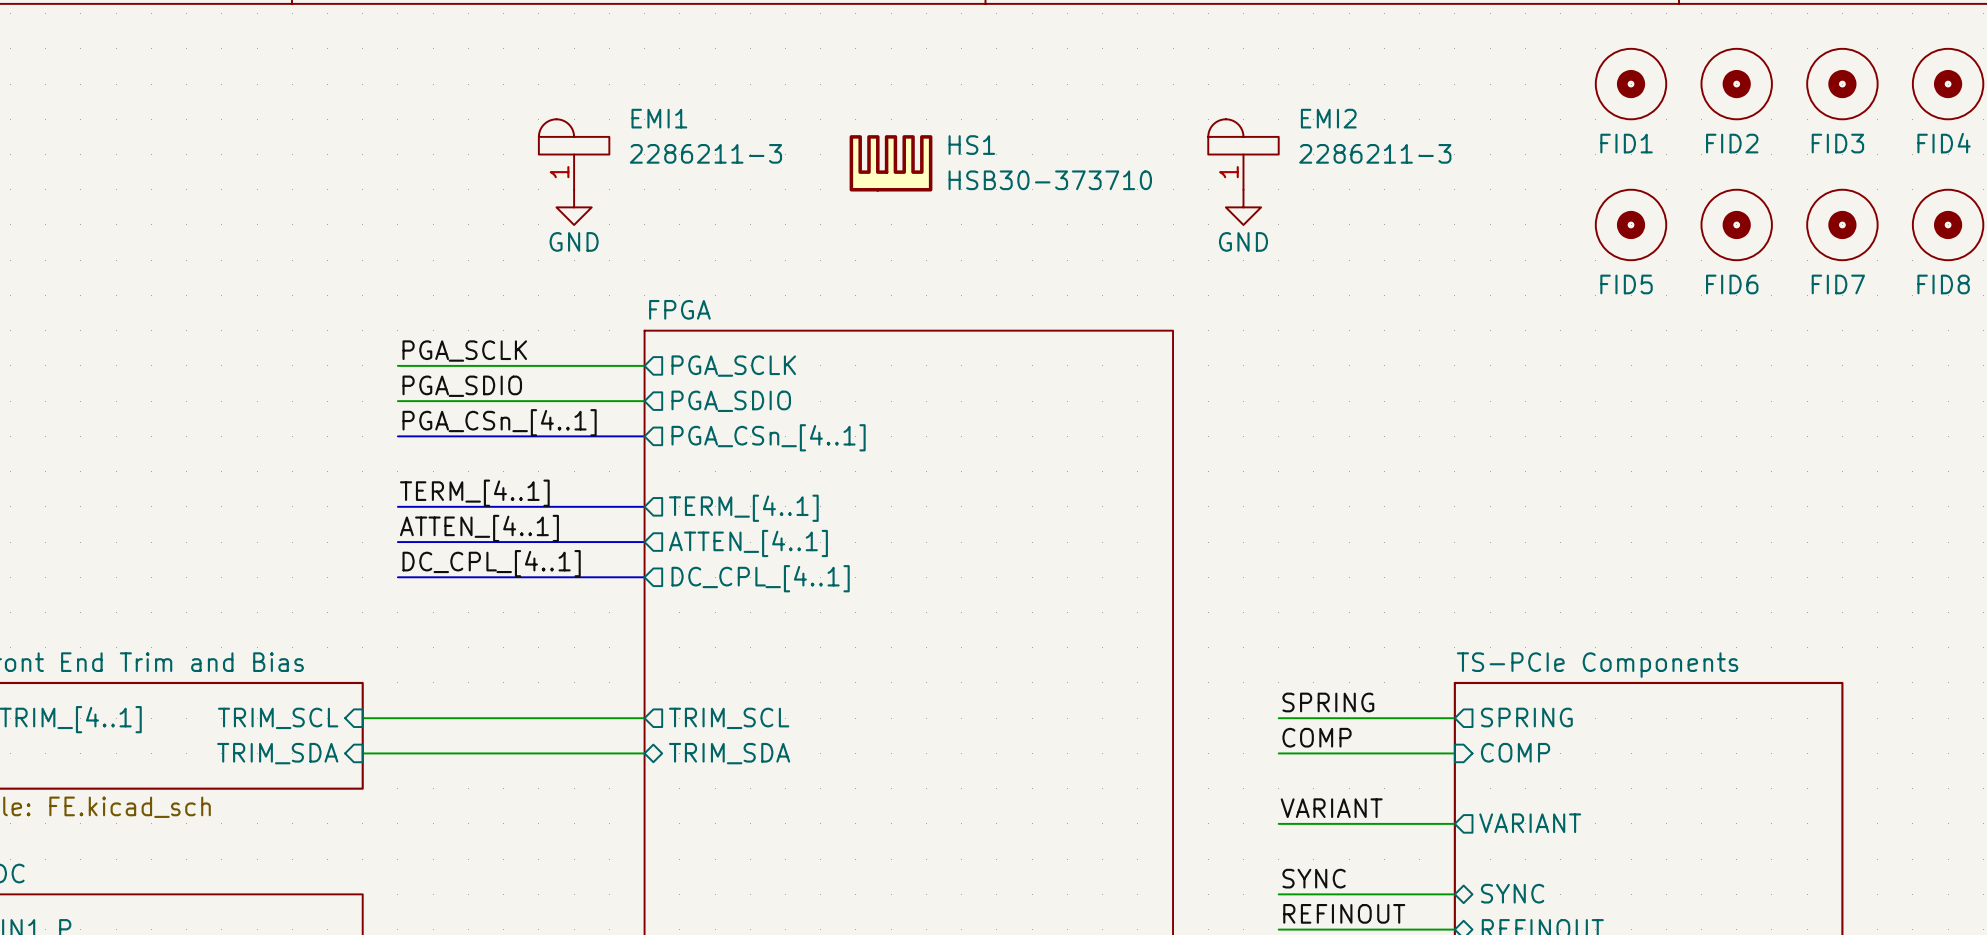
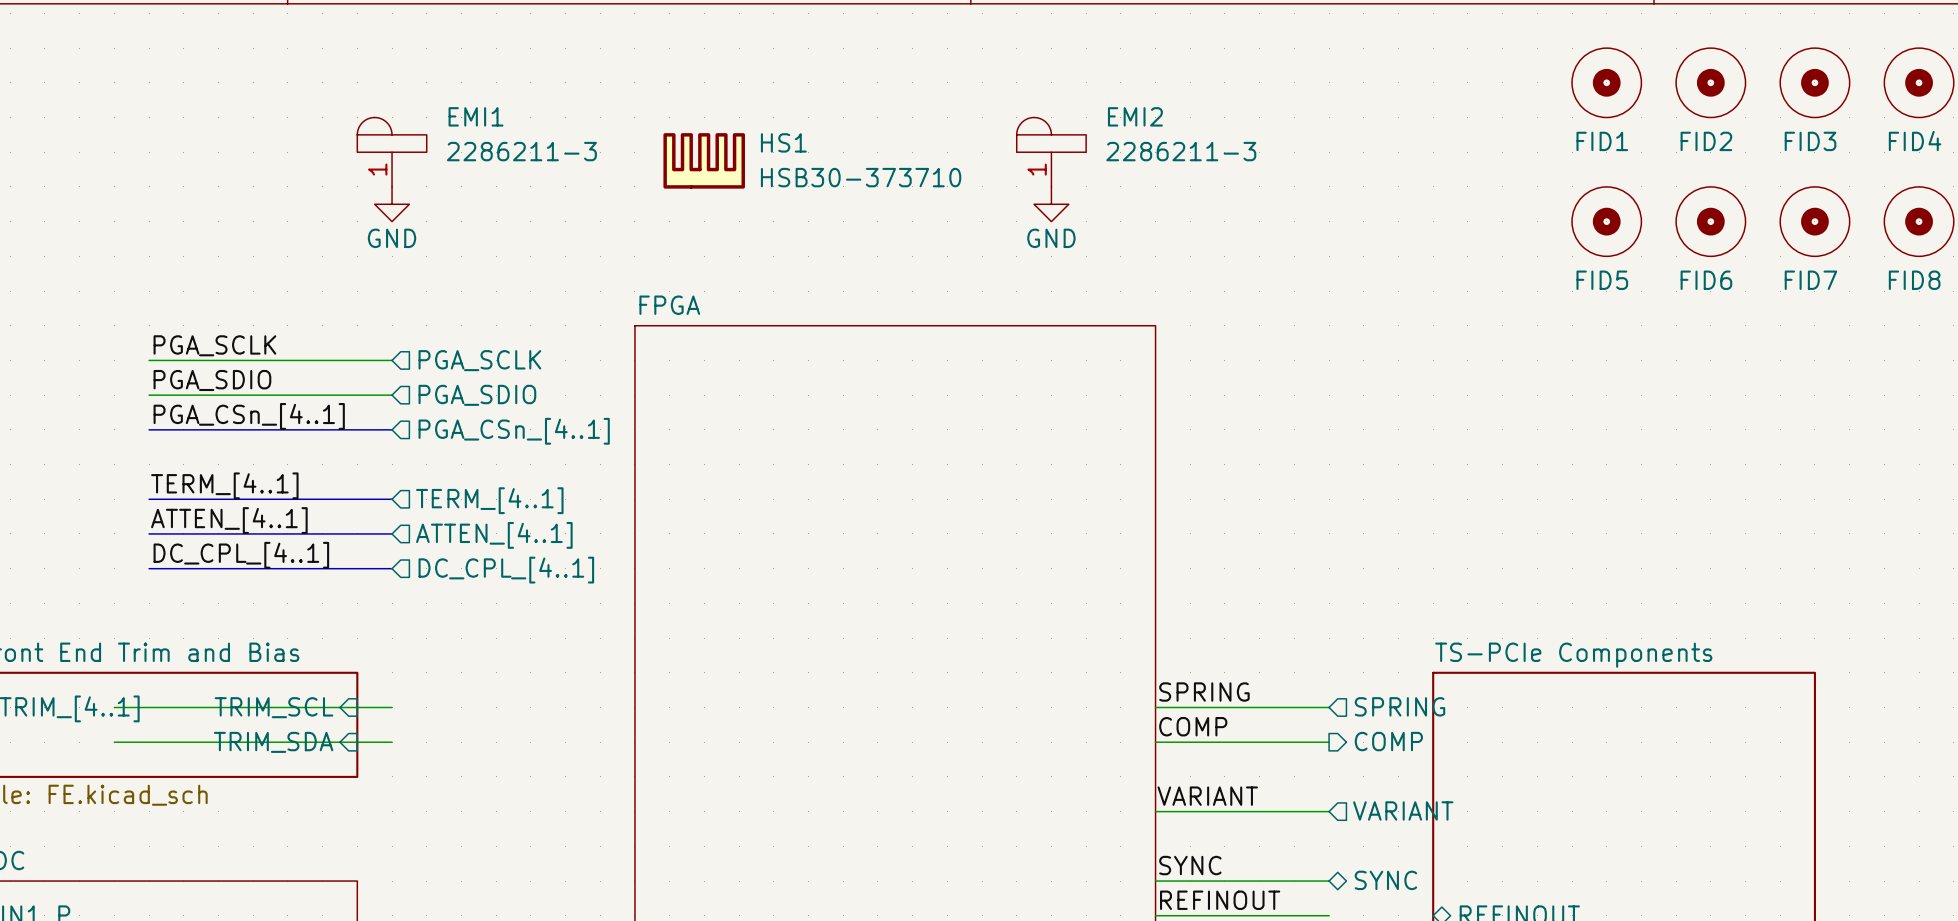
EMI1 position: (574, 154) -> (392, 152)
EMI2 position: (1243, 154) -> (1051, 152)
HS1 position: (891, 163) -> (704, 160)
power symbol position: GND (574, 207) -> GND (392, 204)
power symbol position: GND (1243, 207) -> GND (1051, 204)
label position: PGA_SCLK (464, 351) -> PGA_SCLK (214, 345)
wire: (397, 365) (644, 365) -> (392, 360) (149, 360)
sheet pin position: PGA_SCLK (733, 366) -> PGA_SCLK (479, 360)
label position: PGA_SDIO (462, 386) -> PGA_SDIO (212, 380)
wire: (397, 401) (644, 401) -> (392, 395) (149, 395)
sheet pin position: PGA_SDIO (731, 401) -> PGA_SDIO (477, 395)
label position: PGA_CSn_[4..1] (499, 422) -> PGA_CSn_[4..1] (249, 416)
bus: (397, 436) (644, 436) -> (392, 429) (149, 429)
sheet pin position: PGA_CSn_[4..1] (768, 437) -> PGA_CSn_[4..1] (514, 431)
label position: TERM_[4..1] (474, 493) -> TERM_[4..1] (224, 485)
bus: (397, 506) (644, 506) -> (392, 499) (149, 499)
sheet pin position: TERM_[4..1] (743, 508) -> TERM_[4..1] (489, 500)
label position: ATTEN_[4..1] (479, 528) -> ATTEN_[4..1] (229, 520)
bus: (397, 542) (644, 542) -> (392, 533) (149, 533)
sheet pin position: ATTEN_[4..1] (748, 543) -> ATTEN_[4..1] (494, 535)
label position: DC_CPL_[4..1] (491, 563) -> DC_CPL_[4..1] (241, 555)
bus: (397, 577) (644, 577) -> (392, 568) (149, 568)
sheet pin position: DC_CPL_[4..1] (760, 578) -> DC_CPL_[4..1] (506, 570)
label position: SPRING (1328, 702) -> SPRING (1204, 692)
sheet pin position: SPRING (1526, 717) -> SPRING (1399, 706)
wire: (397, 718) (644, 718) -> (114, 707) (357, 707)
sheet pin: TRIM_SCL (729, 718) -> none
wire: (1349, 718) (1454, 718) -> (1155, 707) (1259, 707)
label position: COMP (1317, 737) -> COMP (1193, 726)
sheet pin position: COMP (1515, 752) -> COMP (1388, 741)
wire: (397, 753) (644, 753) -> (114, 742) (357, 742)
sheet pin: TRIM_SDA (729, 753) -> none
wire: (1349, 753) (1454, 753) -> (1155, 742) (1259, 742)
label position: VARIANT (1331, 808) -> VARIANT (1207, 796)
wire: (1349, 823) (1454, 823) -> (1155, 811) (1259, 811)
sheet pin position: VARIANT (1530, 823) -> VARIANT (1403, 810)
label position: SYNC (1314, 878) -> SYNC (1190, 865)
sheet pin position: SYNC (1512, 893) -> SYNC (1385, 880)
wire: (1349, 894) (1454, 894) -> (1155, 881) (1259, 881)
label position: REFINOUT (1344, 913) -> REFINOUT (1220, 900)
wire: (1349, 929) (1454, 929) -> (1155, 915) (1259, 915)

